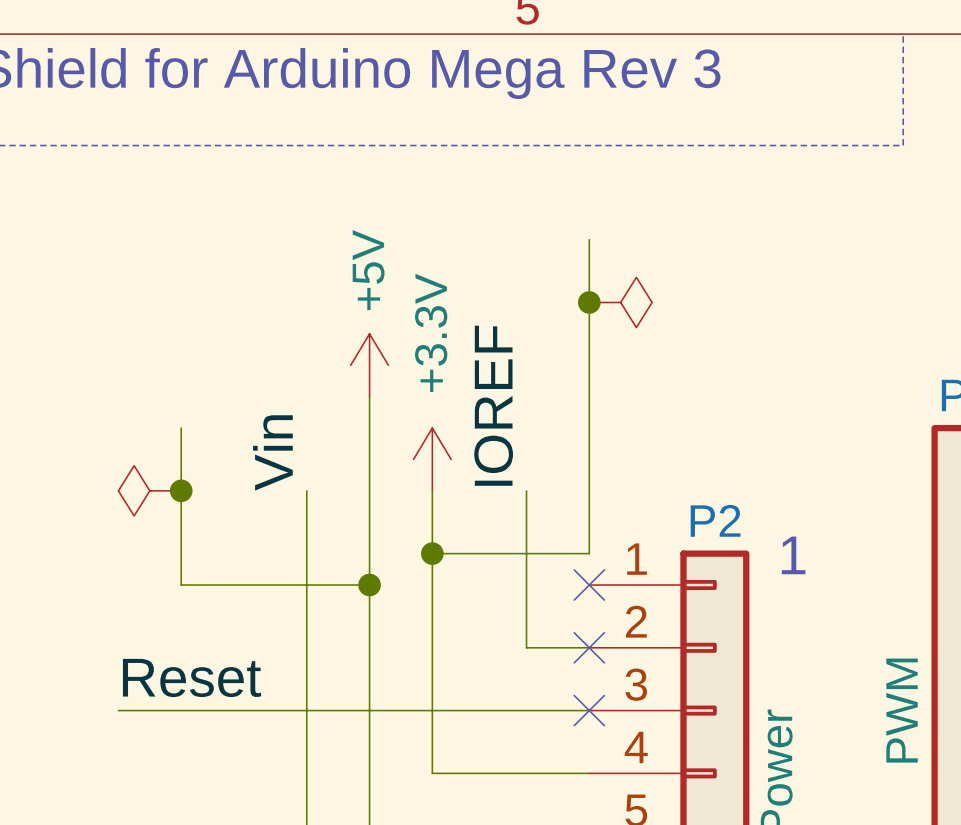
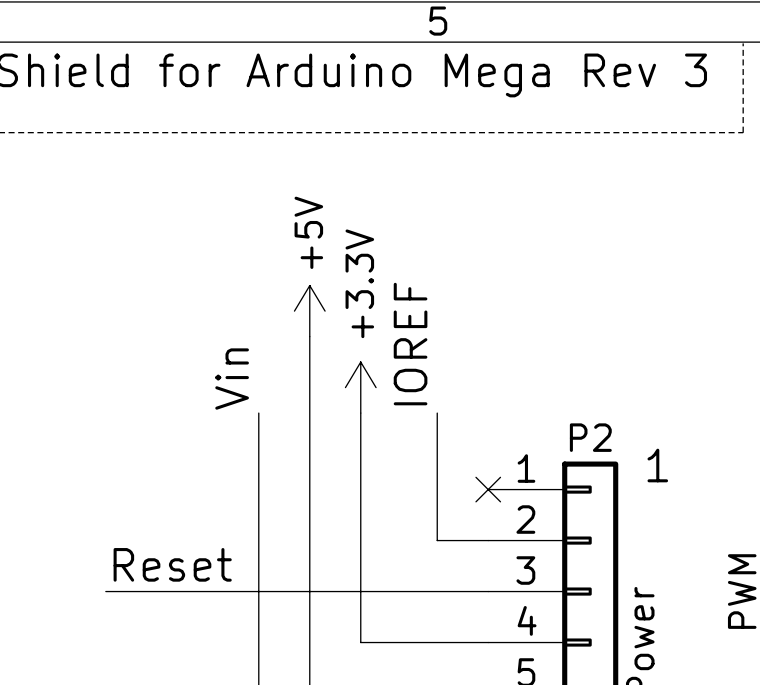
wire: (589, 239) (589, 553) (432, 553) -> none
junction: (589, 302) -> none
power symbol: (620, 302) -> none
wire: (181, 428) (181, 585) (369, 585) -> none
power symbol: (149, 490) -> none
junction: (181, 490) -> none
junction: (432, 553) -> none
junction: (369, 585) -> none
no-connect mark: (589, 647) -> none
no-connect mark: (589, 710) -> none

